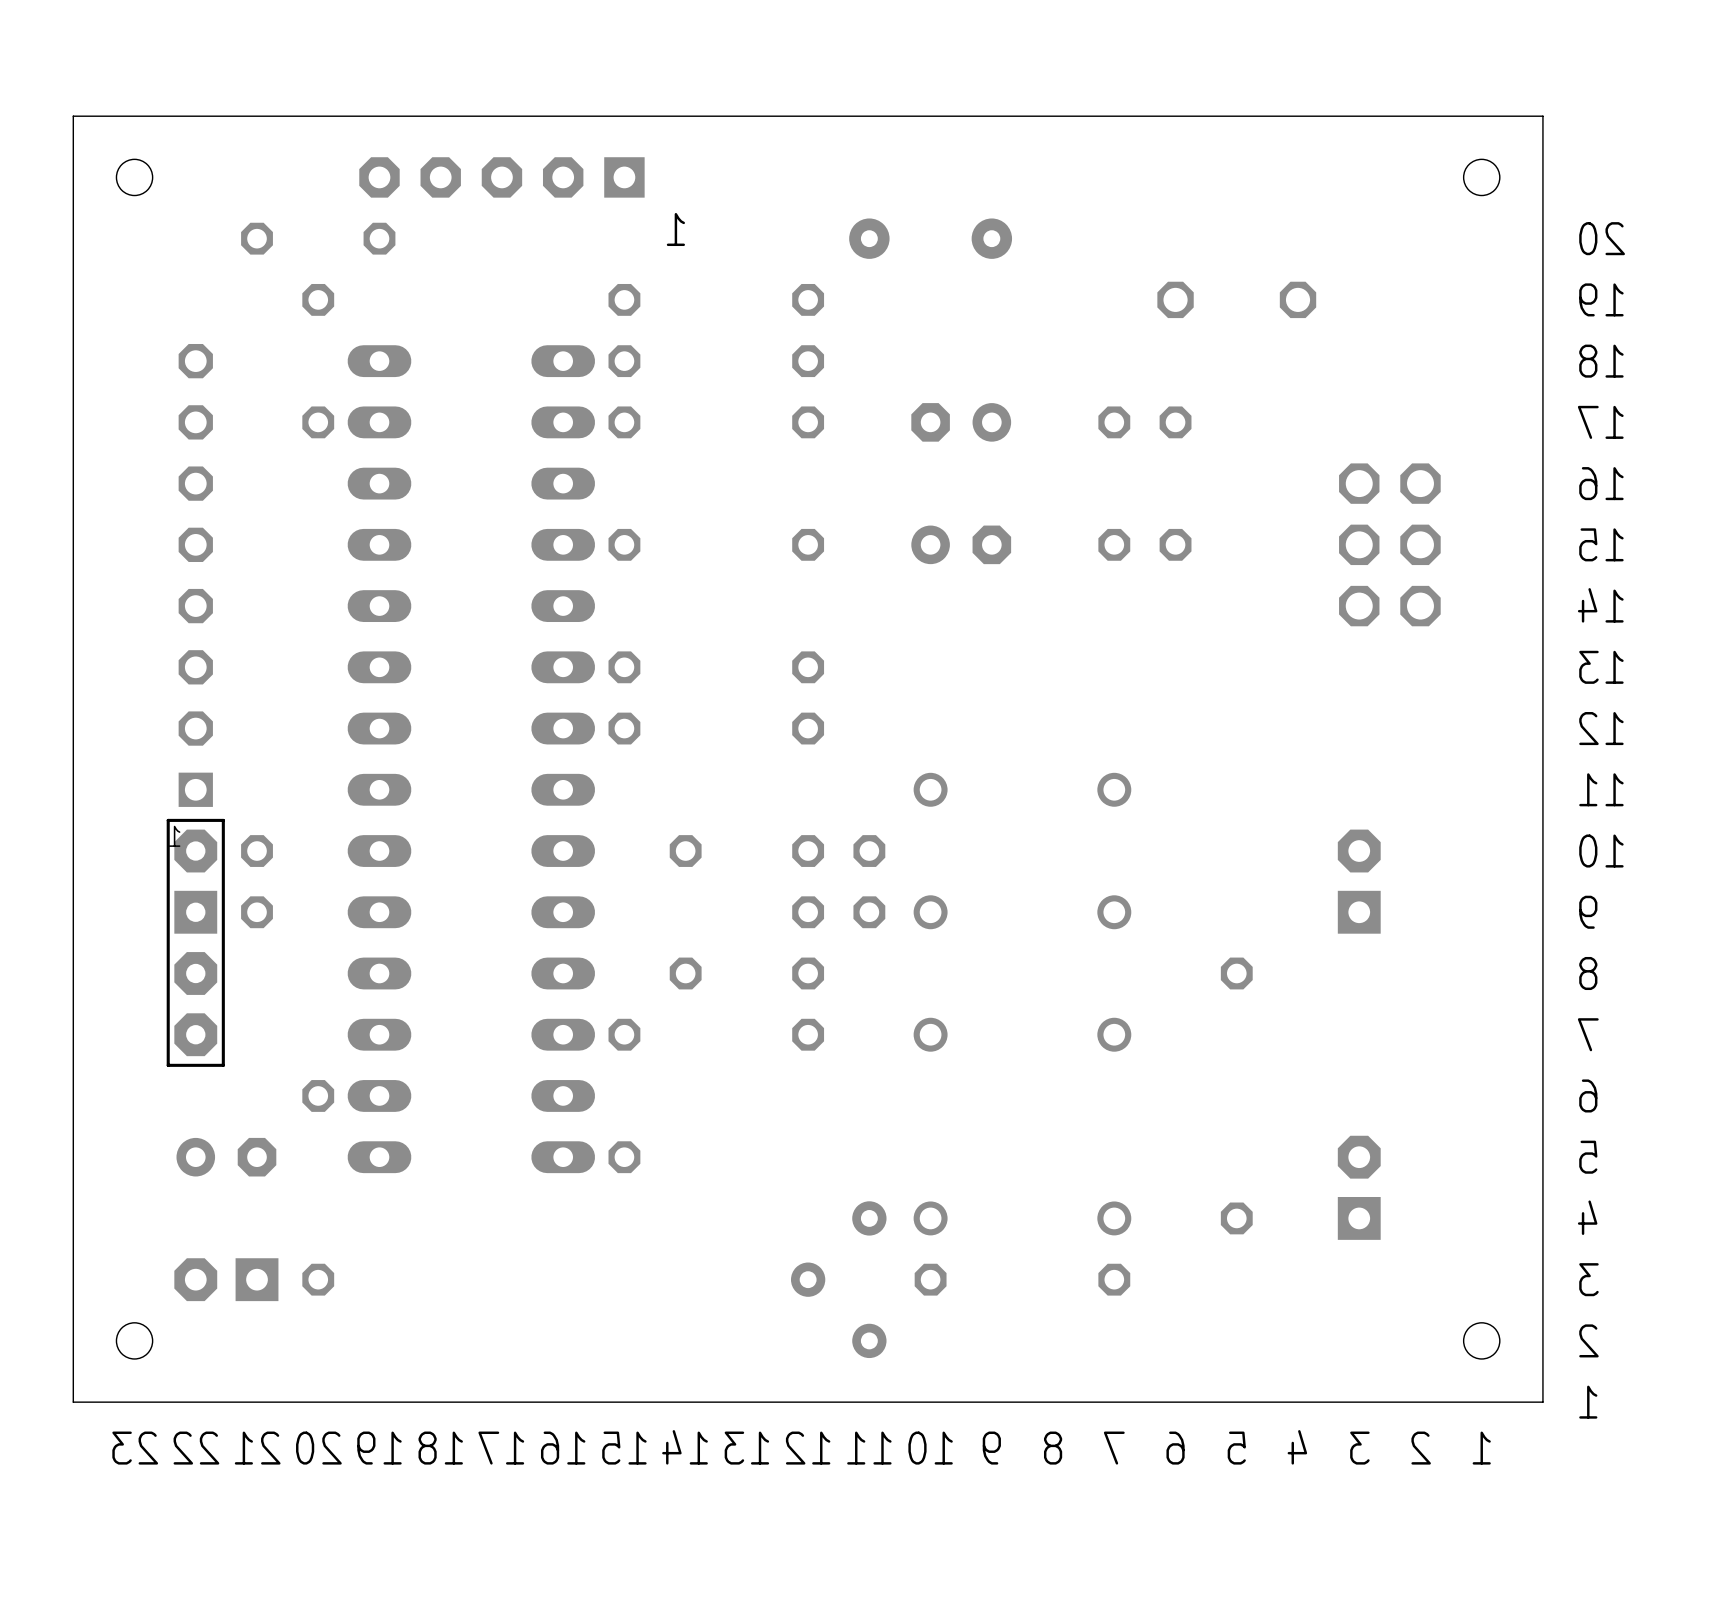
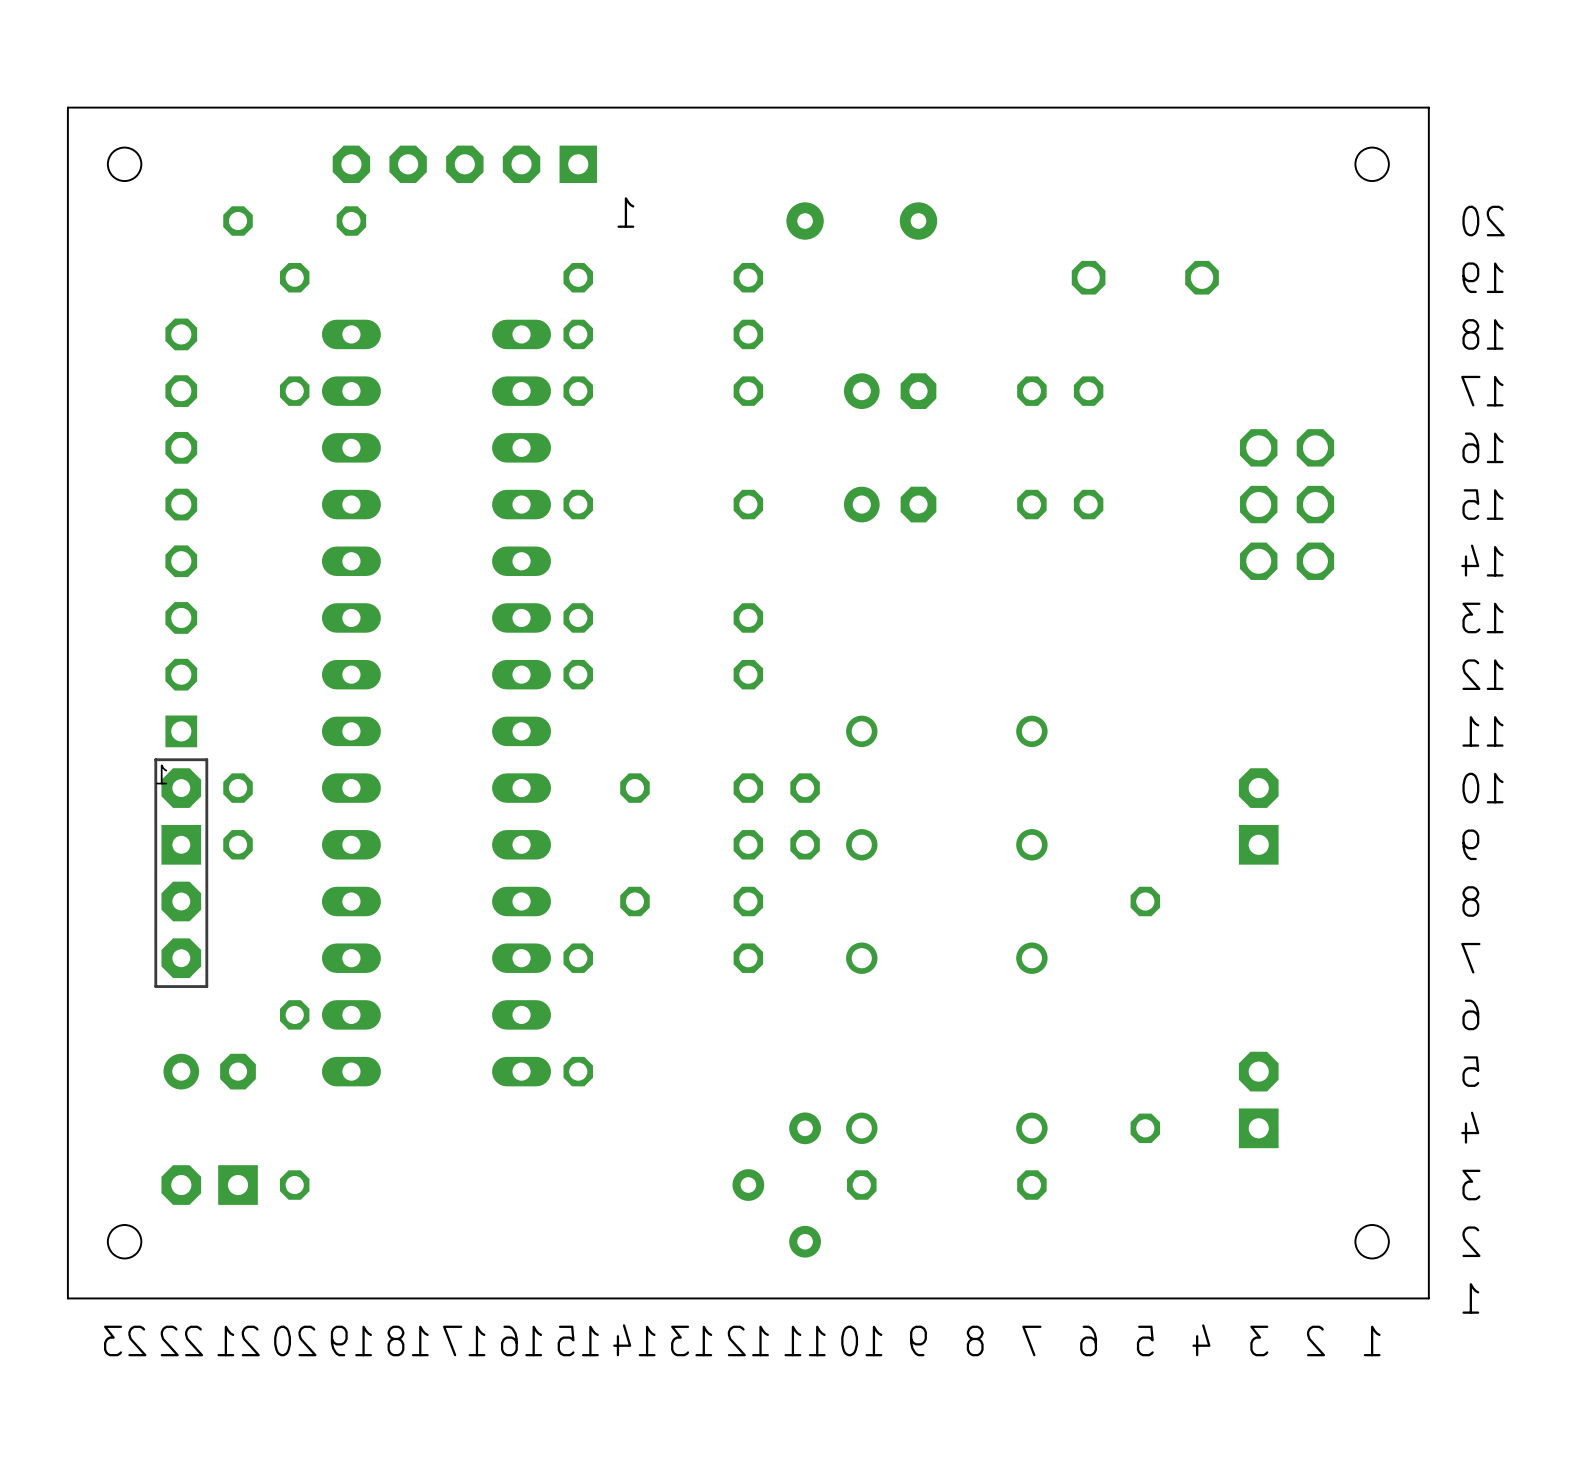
part rotation: 0° (961, 422) -> 180° (890, 391)

